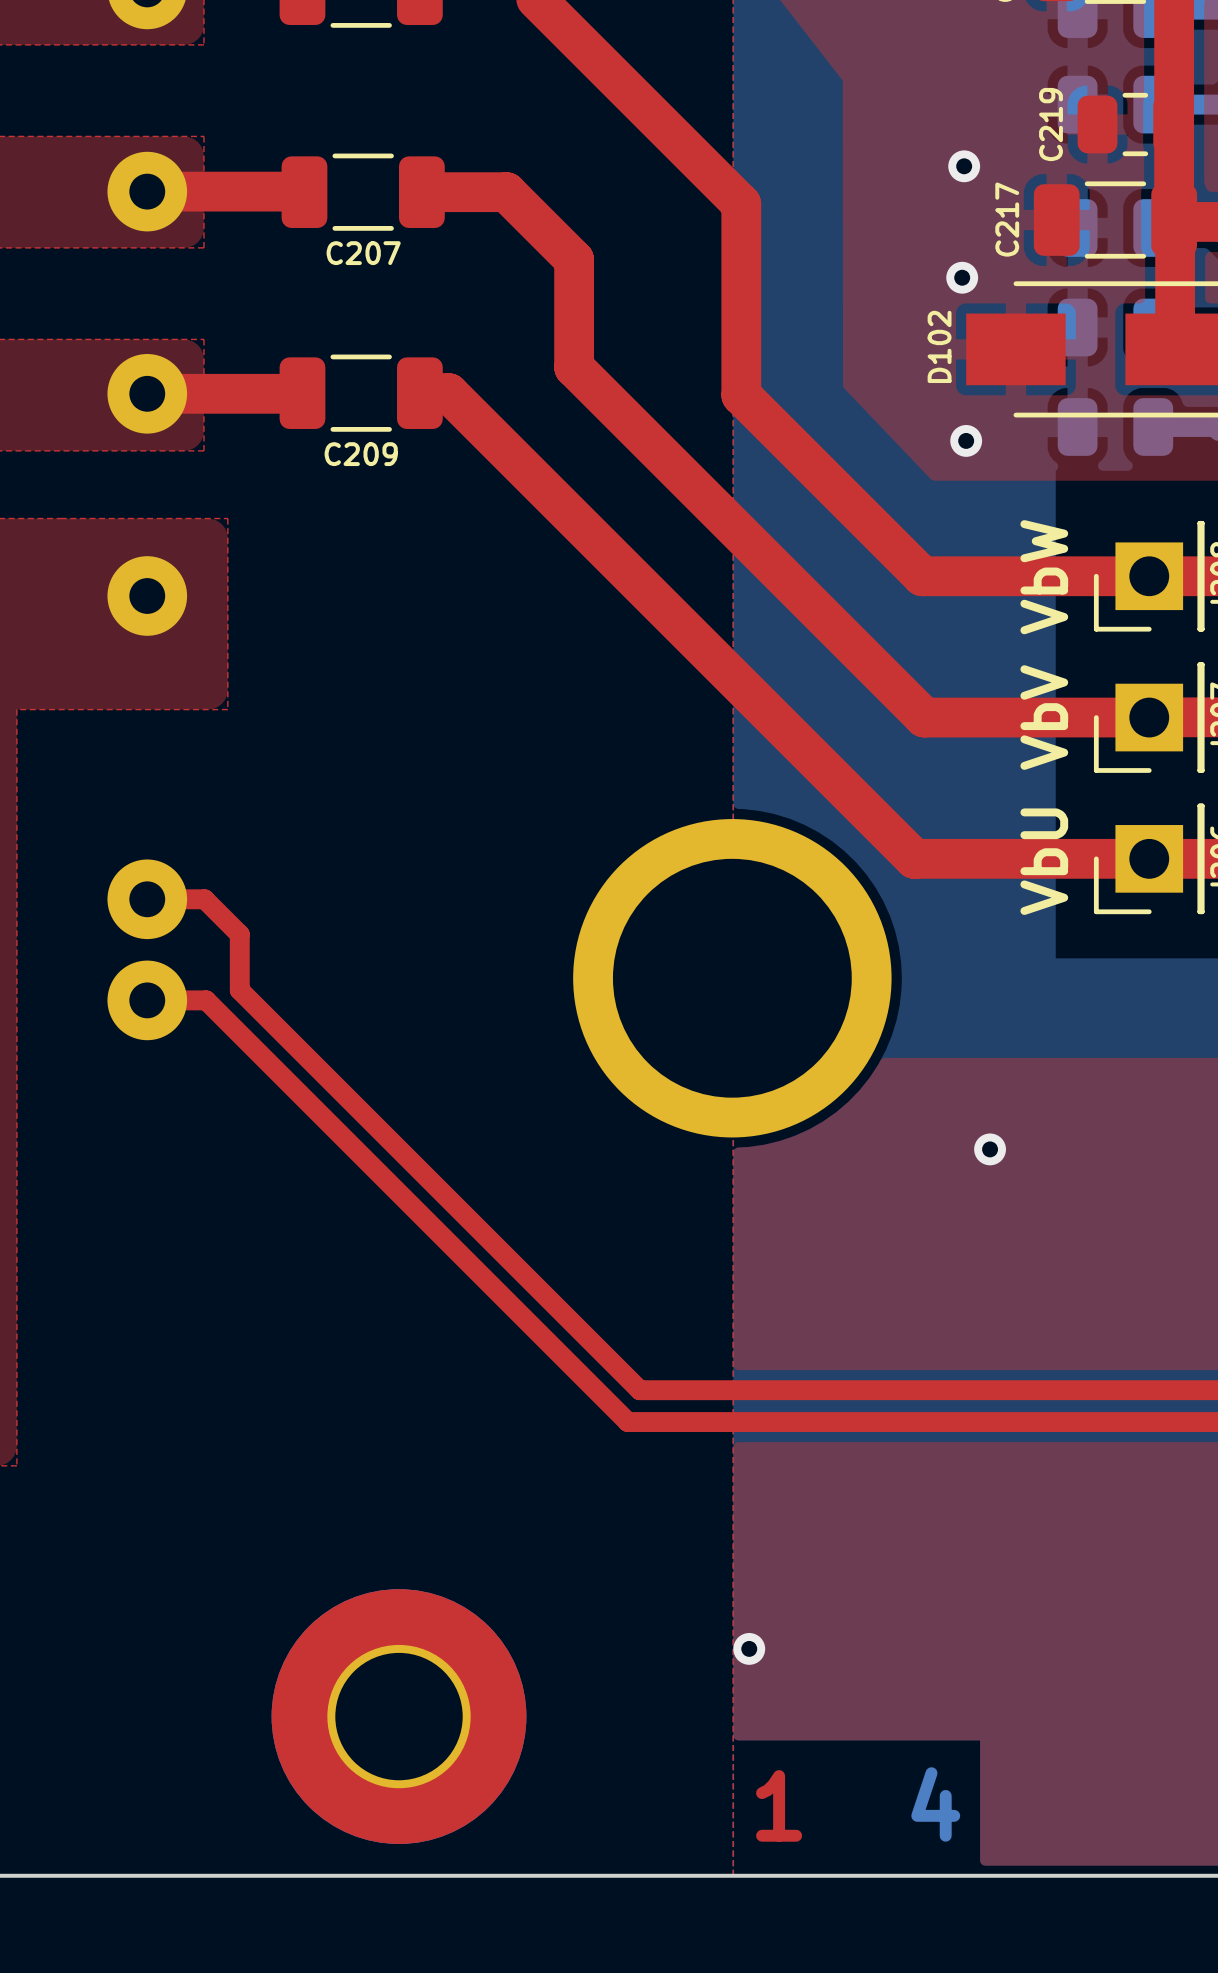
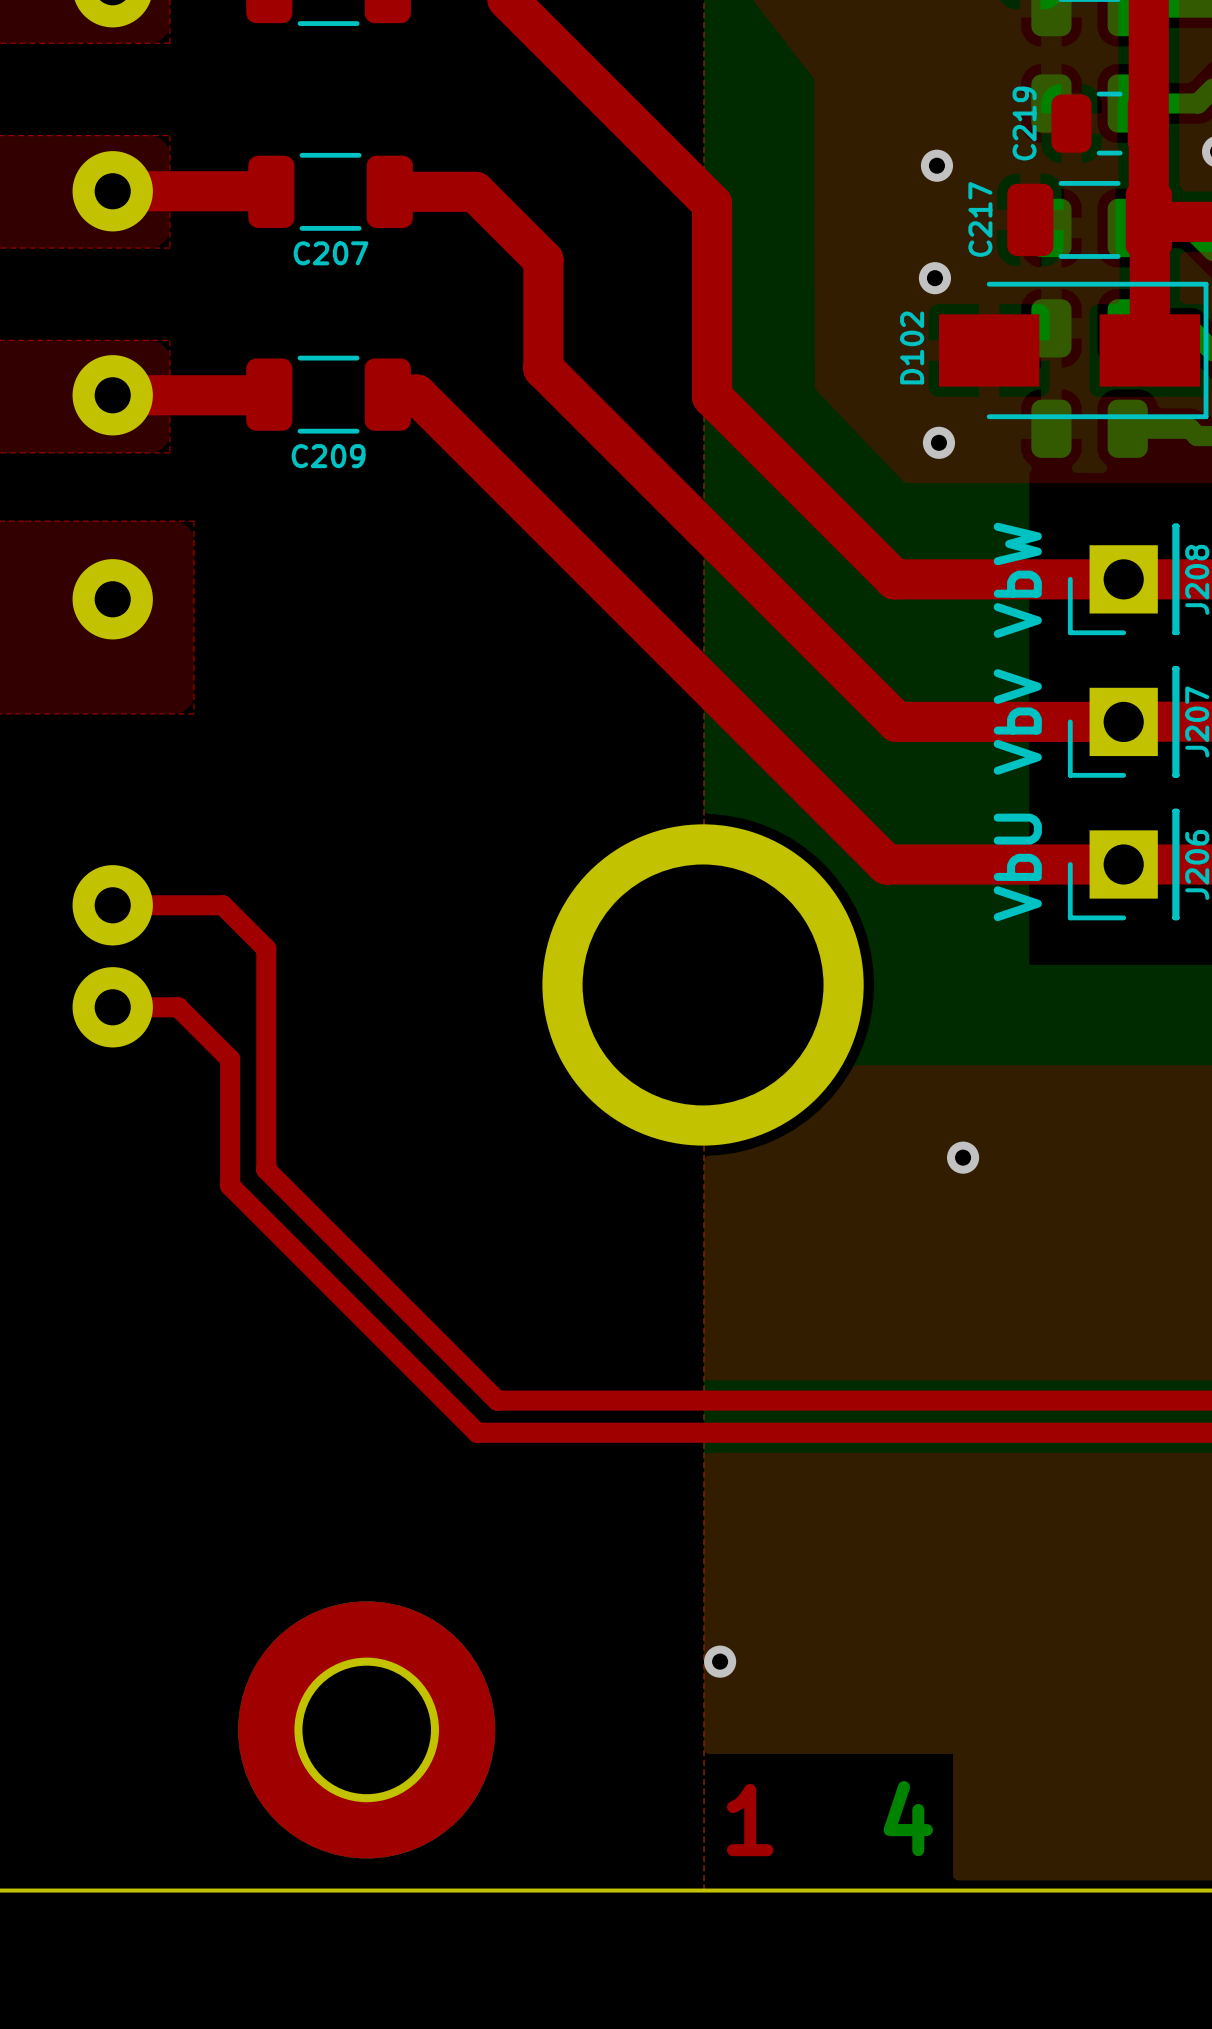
top track: (204, 899) (239, 934) (239, 990) (639, 1390) -> (170, 905) (222, 905) (266, 948) (266, 1169) (497, 1400) (609, 1400)
top track: (206, 1000) (627, 1422) -> (172, 1007) (178, 1007) (230, 1059) (230, 1185) (477, 1432) (597, 1432)

